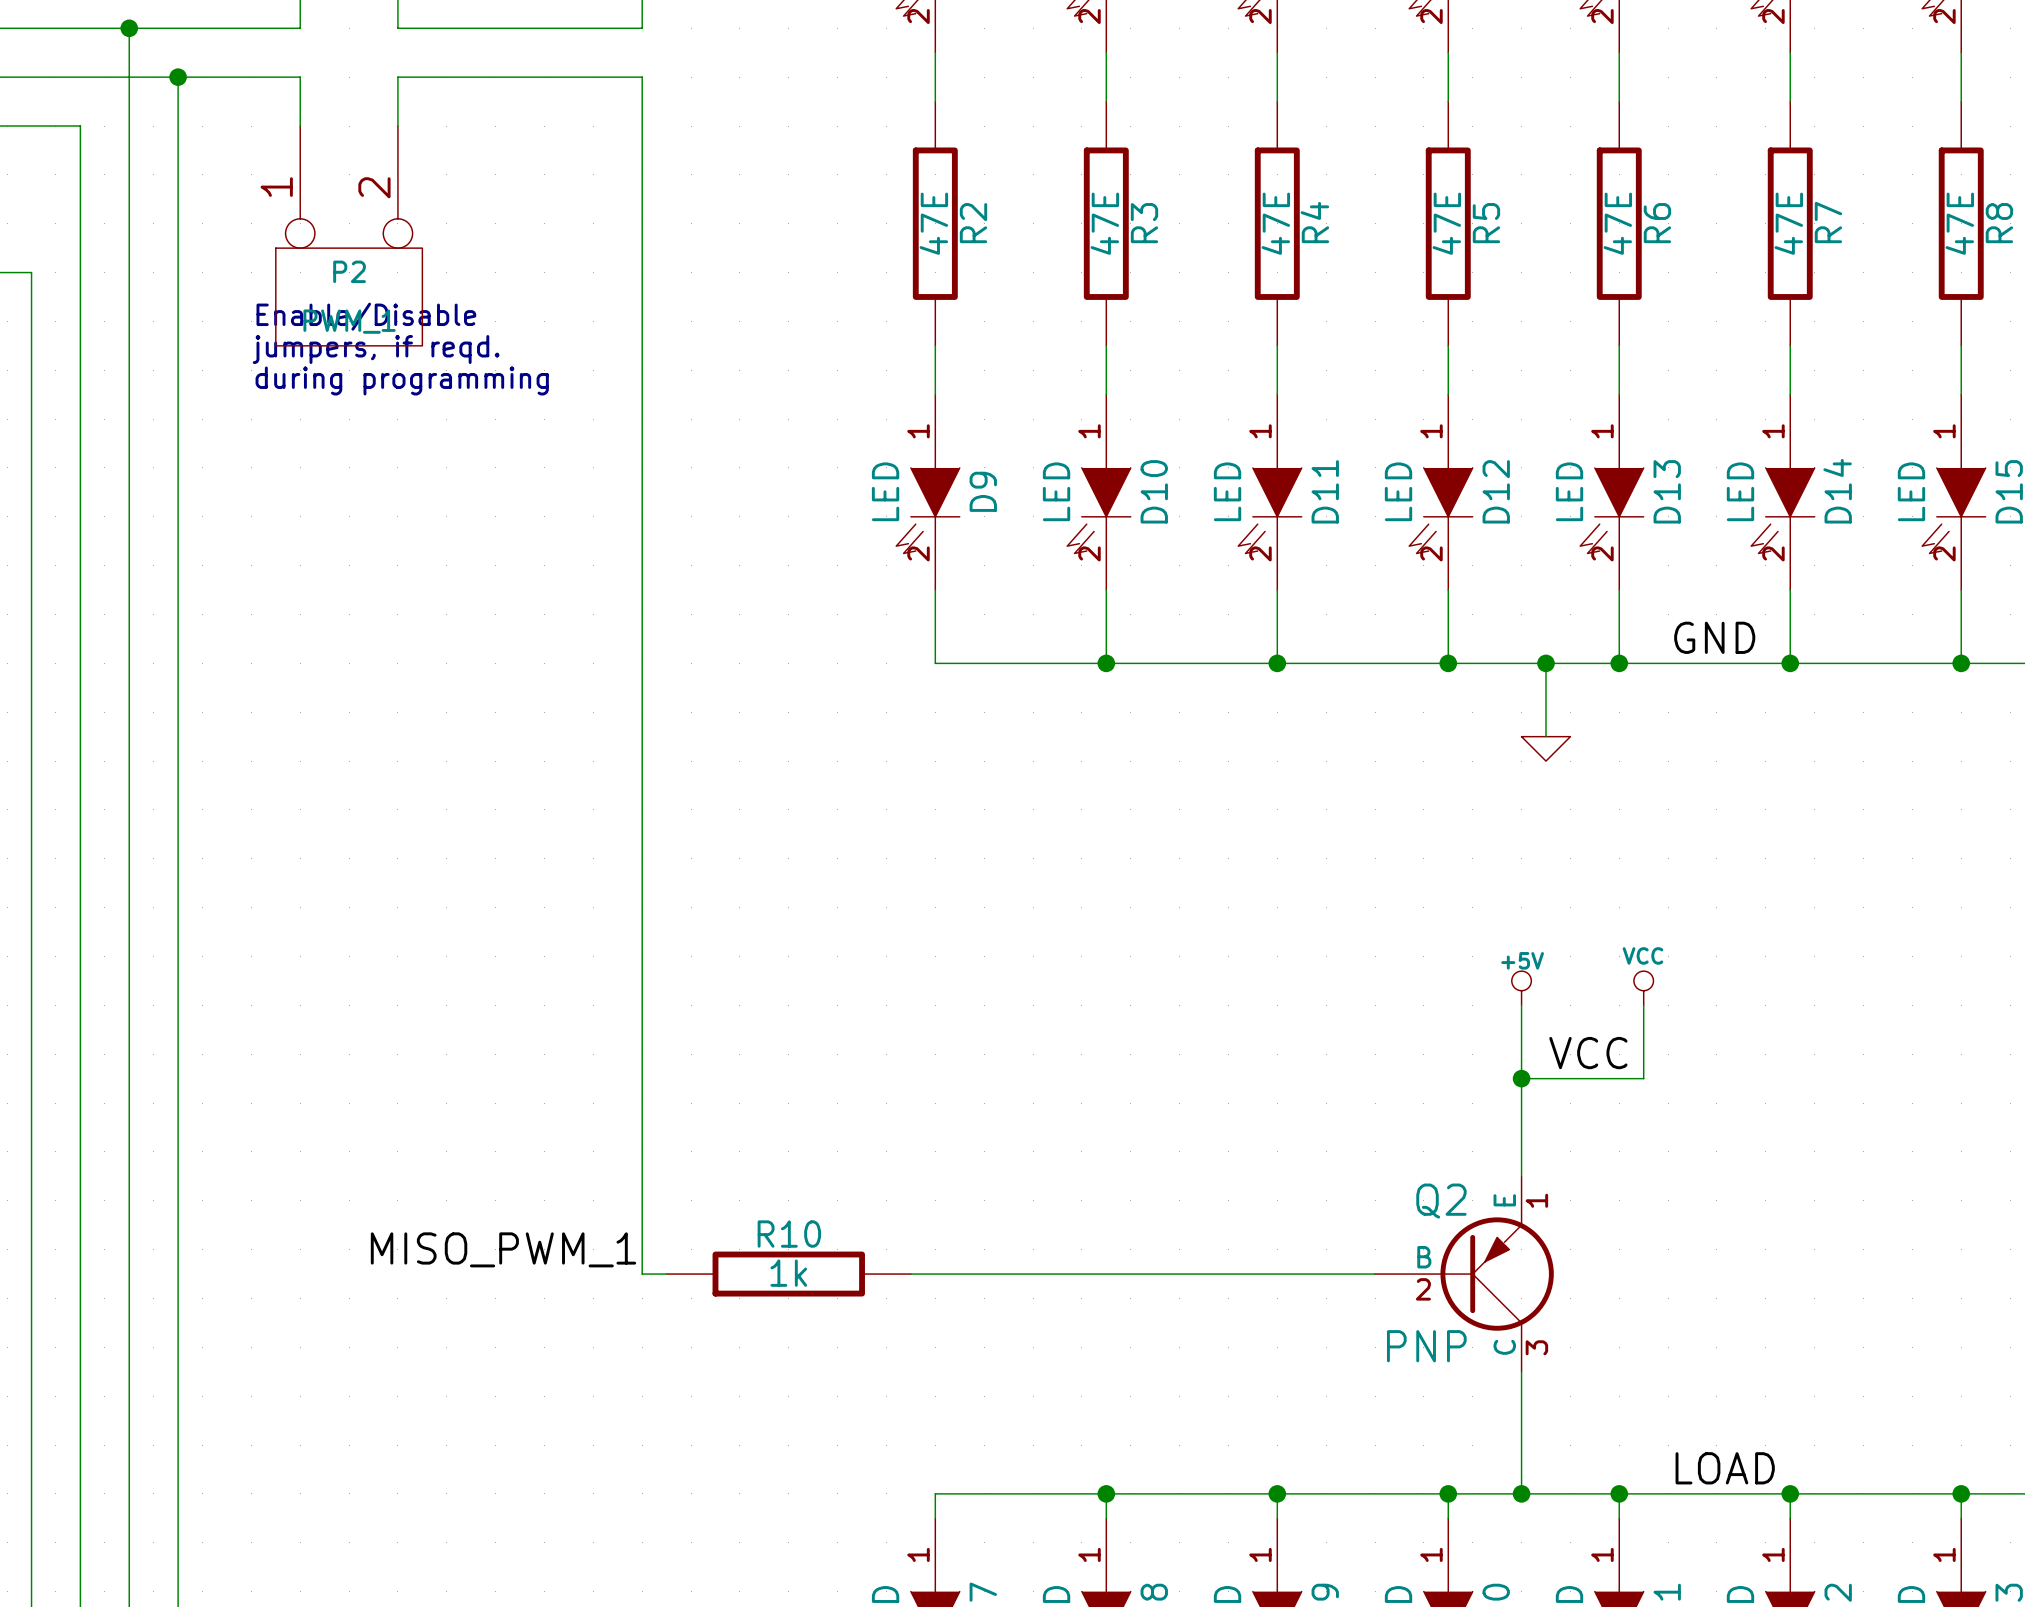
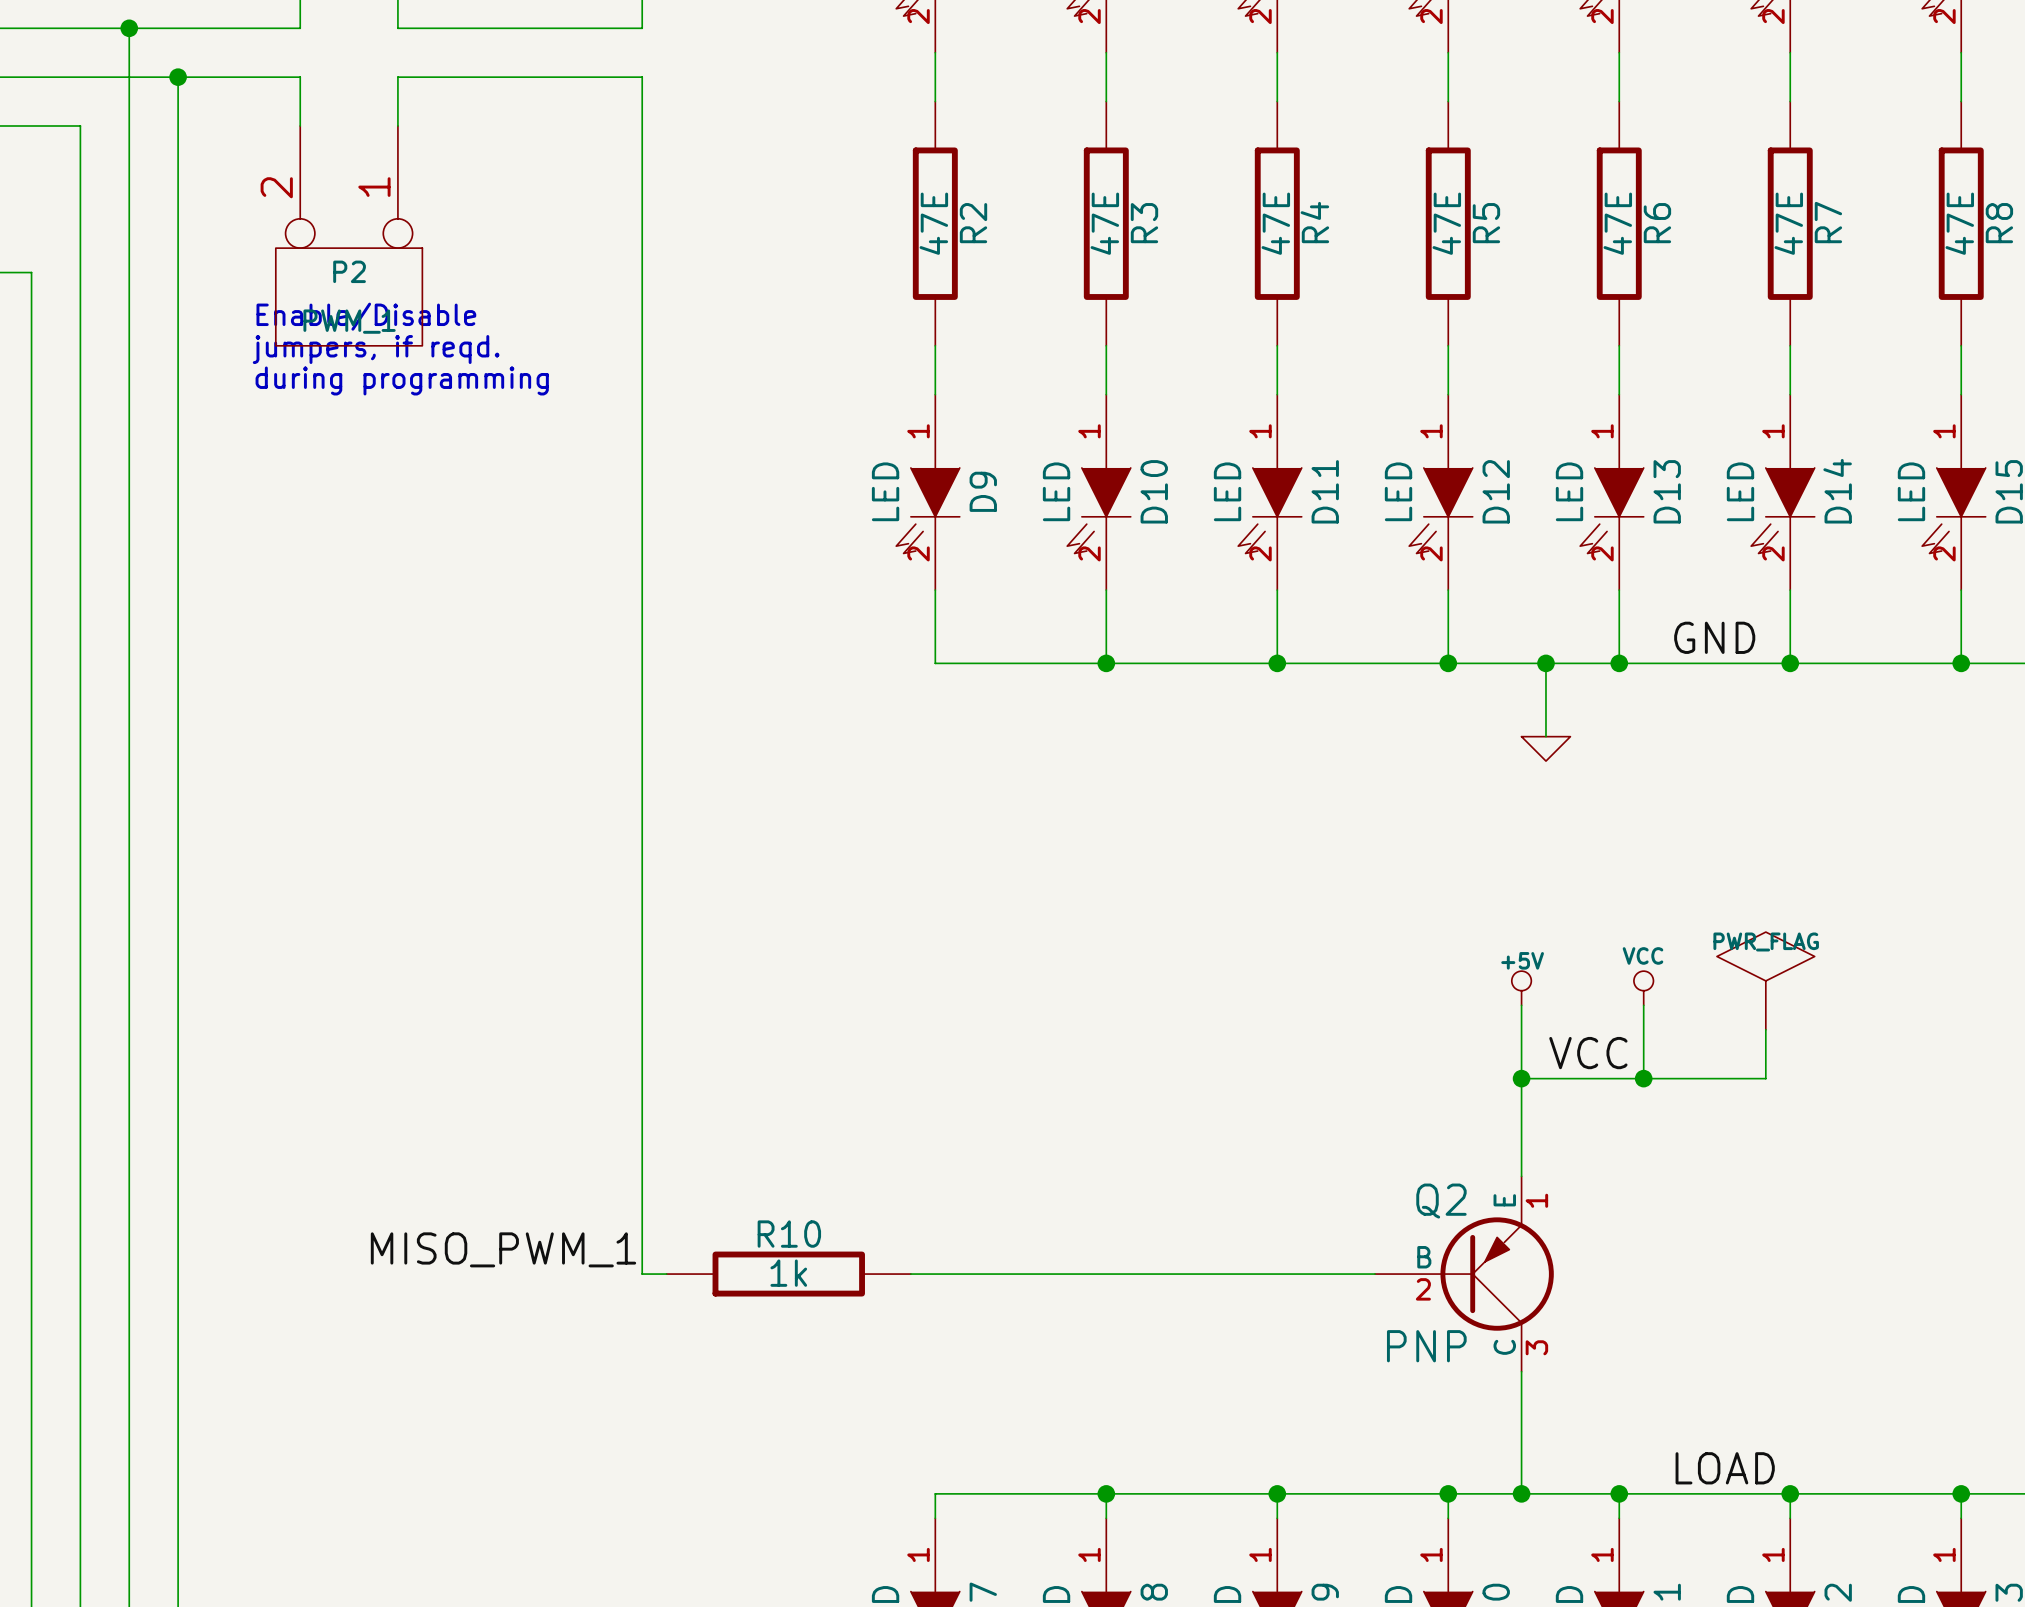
P2 flip: as is (349, 296) -> left-right (349, 296)
power symbol: none -> PWR_FLAG (1765, 980)
wire: none -> (1765, 1029) (1765, 1078) (1643, 1078)
junction: none -> (1643, 1078)

